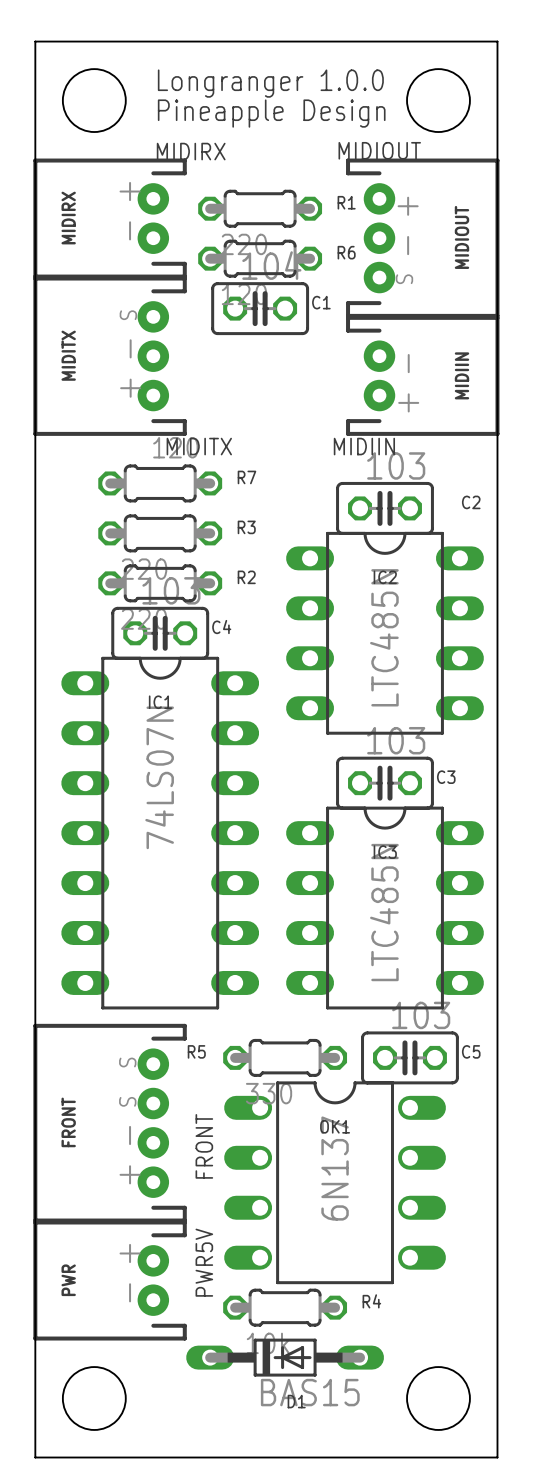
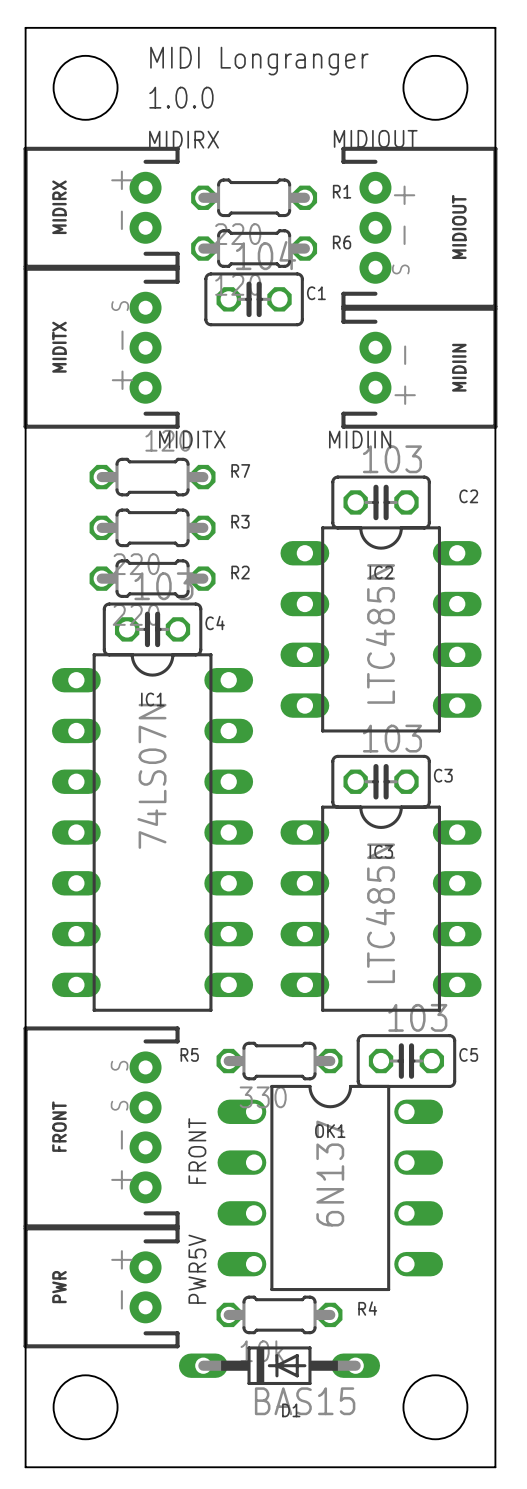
text: Longranger 1.0.0 (270, 83) -> MIDI Longranger (259, 61)
text: Pineapple Design (271, 113) -> 1.0.0 (181, 97)

